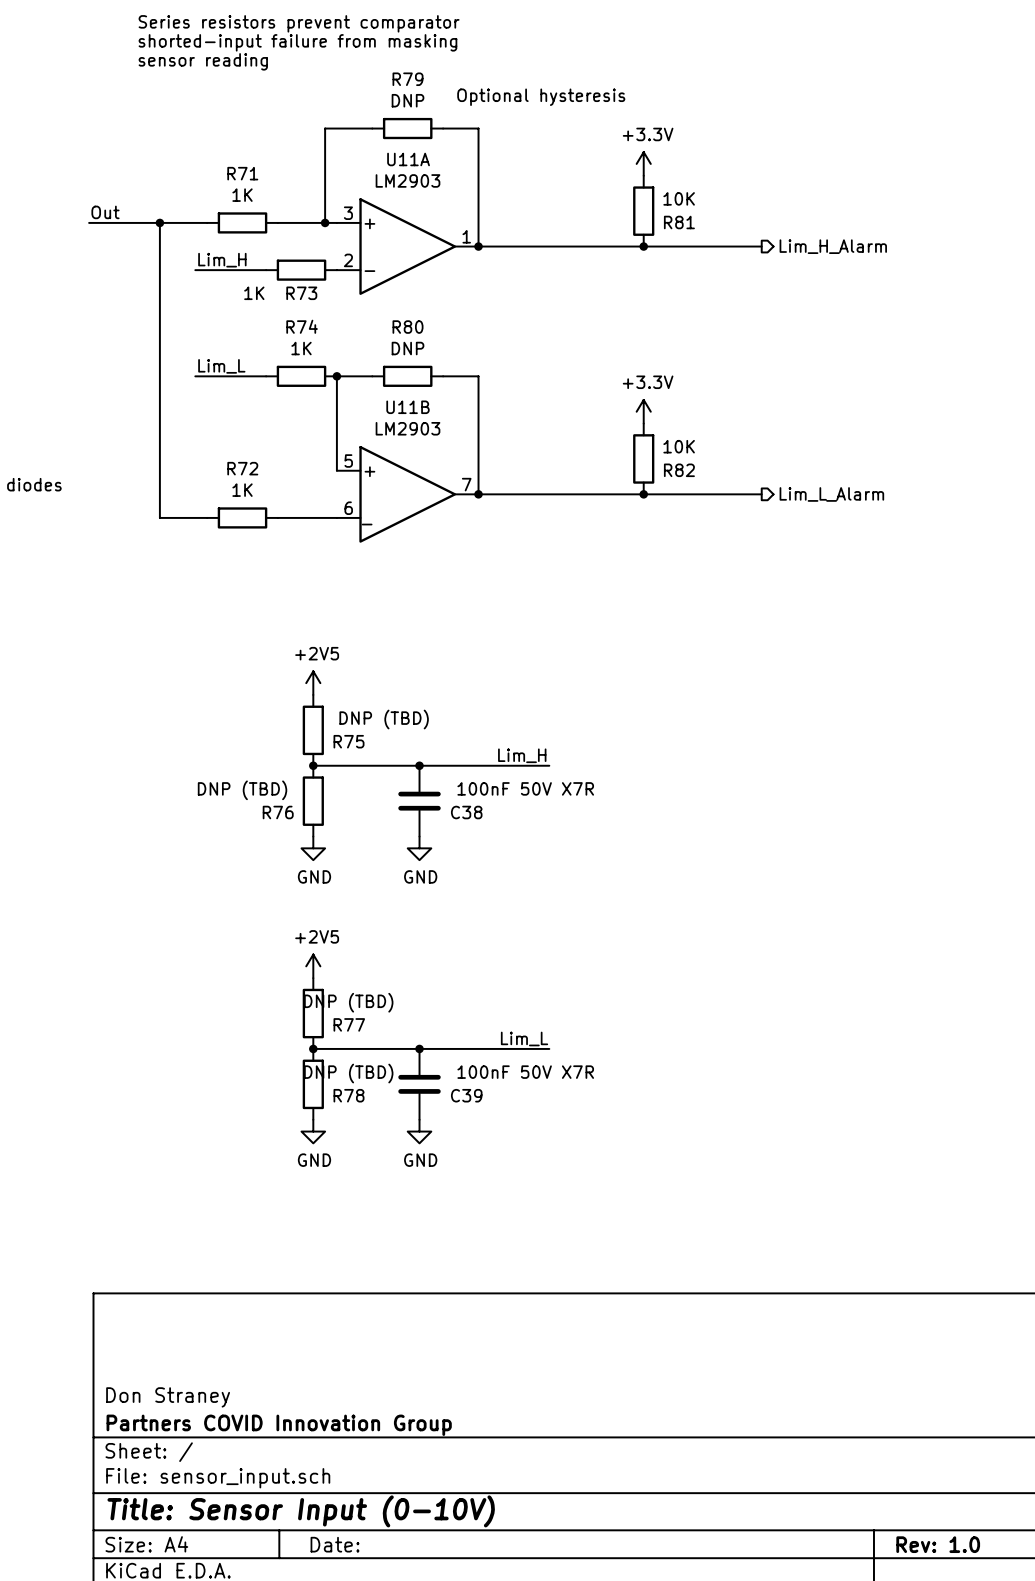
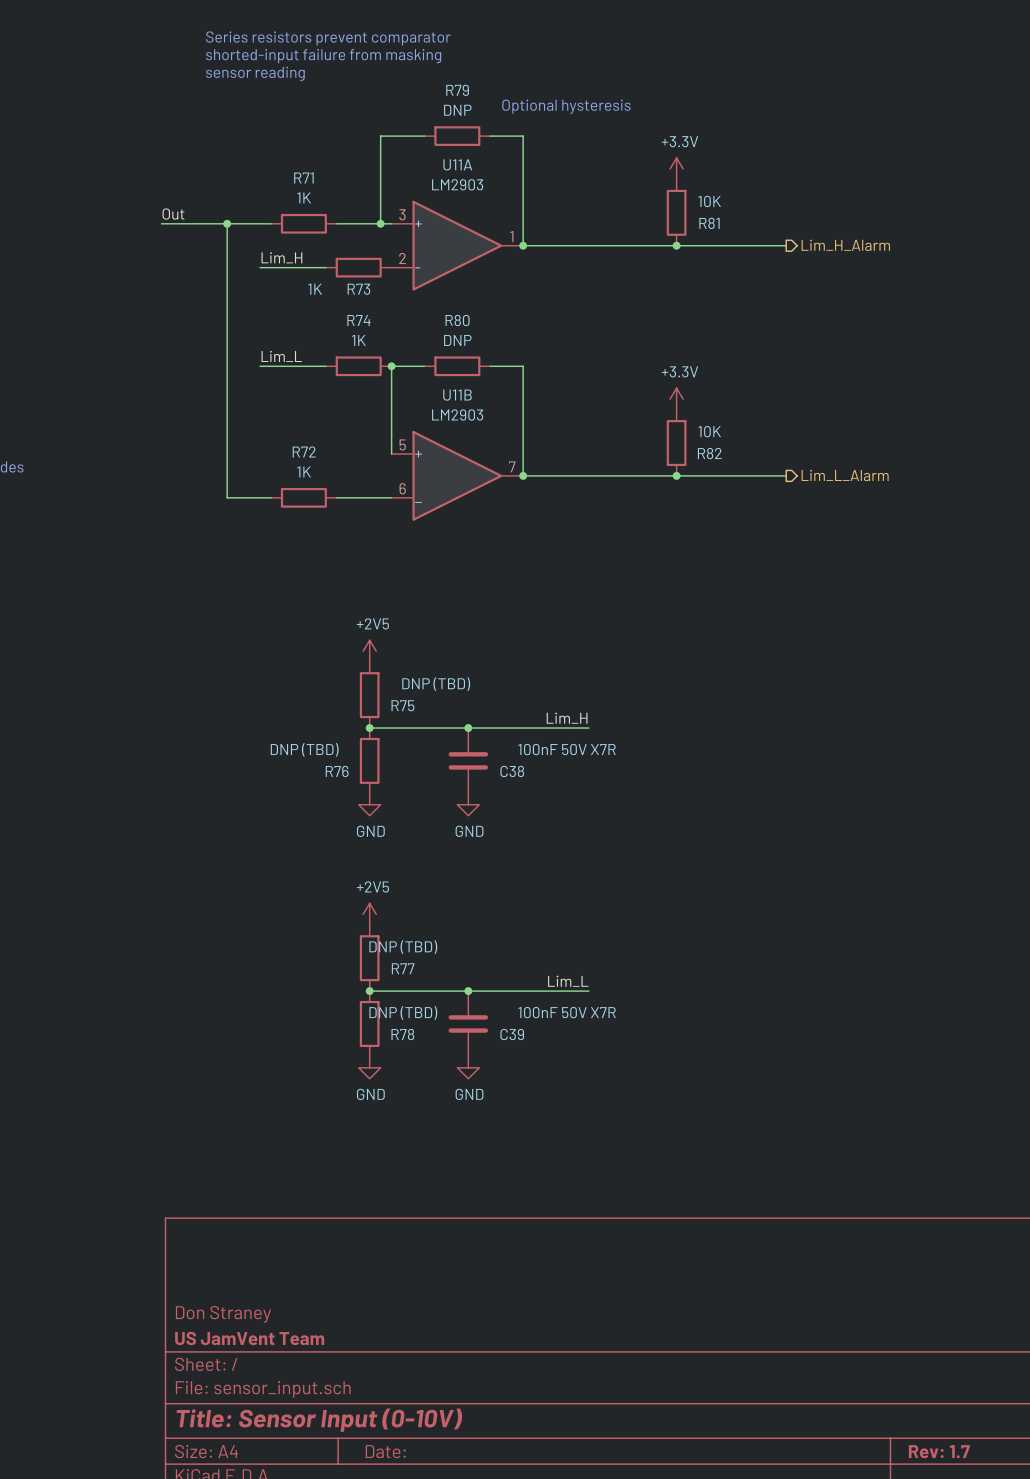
title block: Partners COVID Innovation Group (279, 1425) -> US JamVent Team (249, 1338)
title block: Rev: 1.0 (938, 1544) -> Rev: 1.7 (939, 1451)

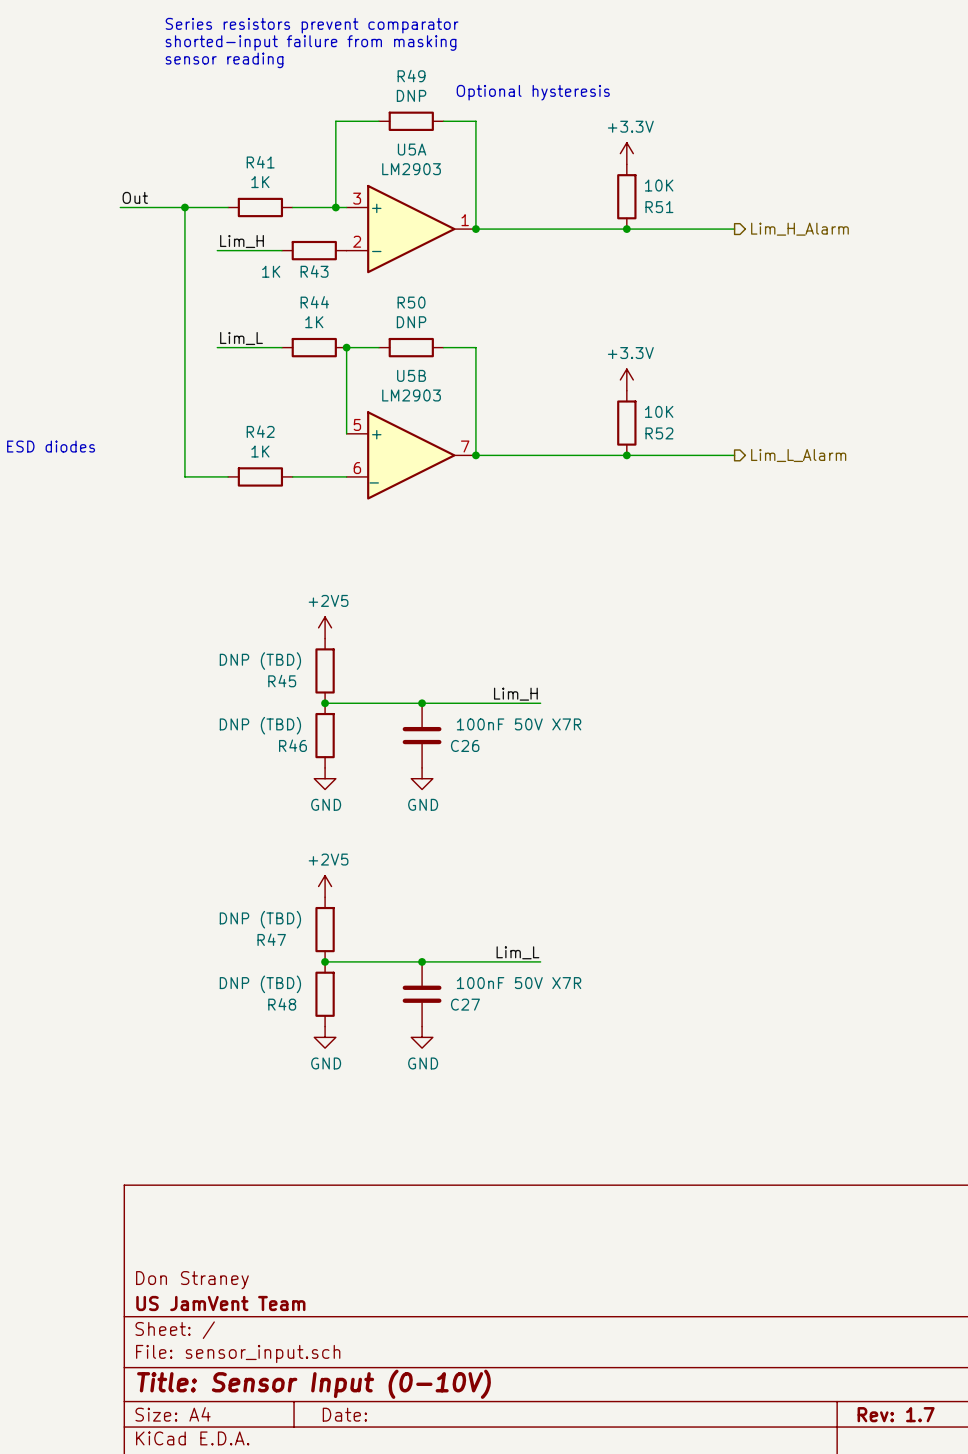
R79 name: R79 (457, 90) -> R49 (411, 76)
U11A name: U11A (457, 164) -> U5A (412, 149)
R71 name: R71 (303, 178) -> R41 (260, 162)
R81 name: R81 (709, 223) -> R51 (659, 207)
R73 name: R73 (358, 289) -> R43 (314, 271)
R74 name: R74 (358, 320) -> R44 (314, 302)
R80 name: R80 (457, 320) -> R50 (411, 302)
U11B name: U11B (457, 395) -> U5B (411, 375)
R72 name: R72 (304, 451) -> R42 (260, 431)
R82 name: R82 (709, 453) -> R52 (659, 433)
R75 value position: DNP (TBD) (436, 684) -> DNP (TBD) (260, 661)
R75 name: R75 (402, 705) -> R45 (282, 681)
R76 name: R76 (337, 771) -> R46 (292, 745)
C38 name: C38 (512, 771) -> C26 (465, 745)
R77 value position: DNP (TBD) (403, 947) -> DNP (TBD) (260, 919)
R77 name: R77 (403, 968) -> R47 (271, 939)
R78 value position: DNP (TBD) (403, 1012) -> DNP (TBD) (260, 984)
R78 name: R78 (402, 1034) -> R48 (282, 1004)
C39 name: C39 (512, 1034) -> C27 (465, 1004)

